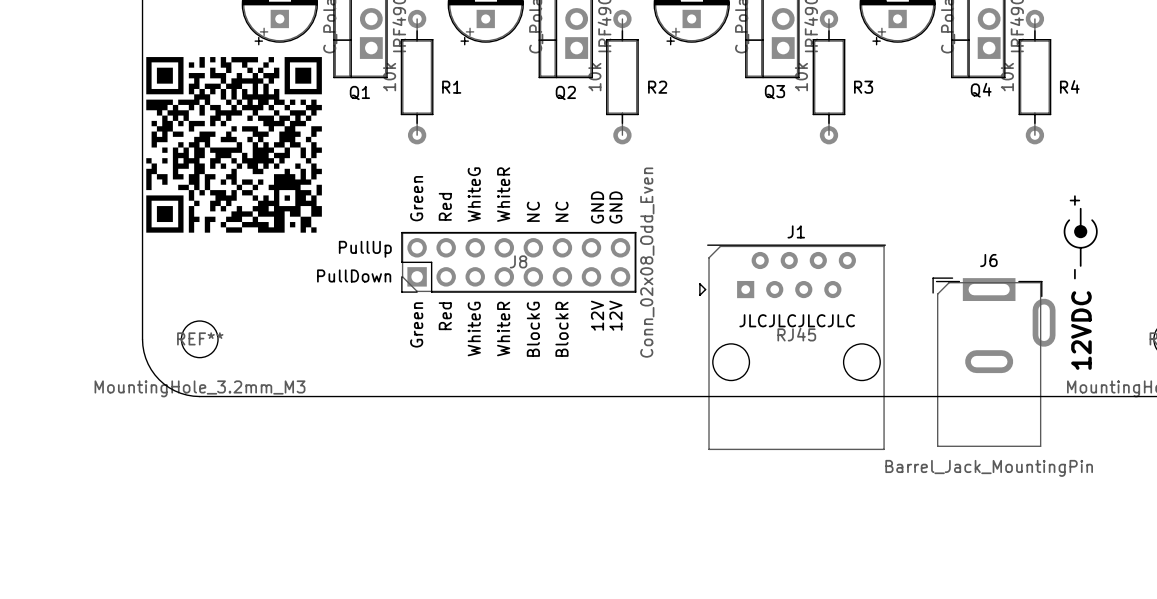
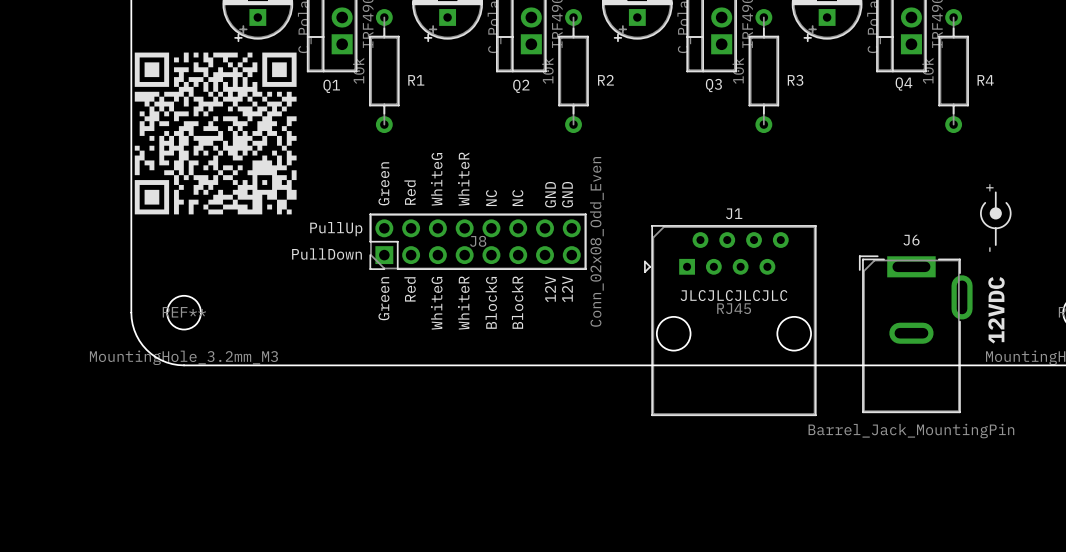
J1 footprint: [699, 244, 886, 451] -> [644, 225, 817, 416]
J6 footprint: [932, 277, 1056, 447] -> [859, 255, 973, 413]

